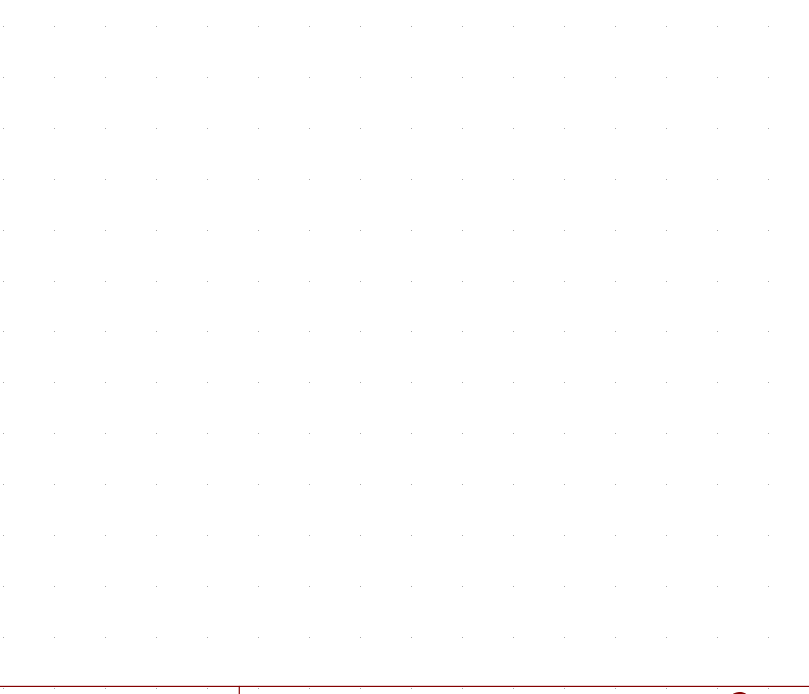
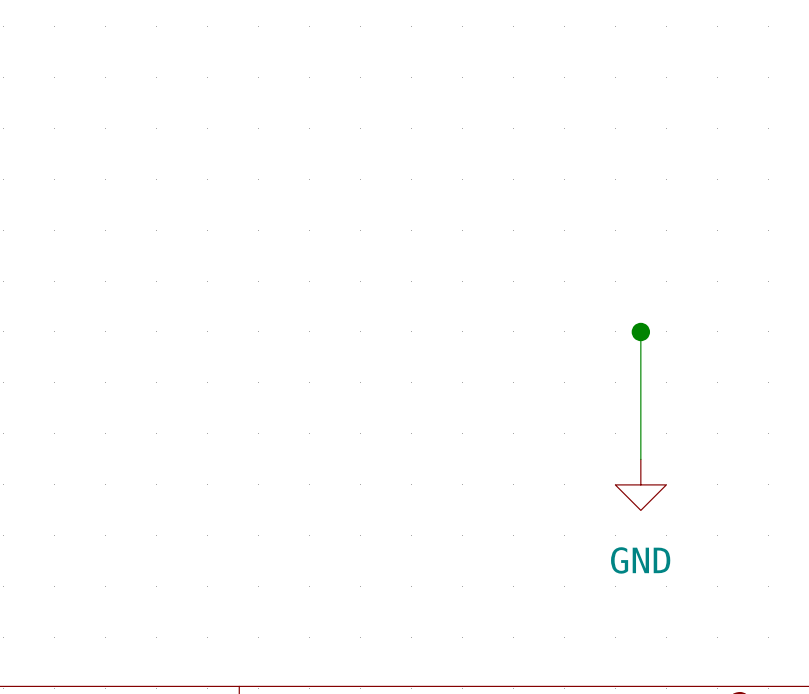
wire: none -> (640, 331) (640, 459)
junction: none -> (640, 331)
power symbol: none -> GND (640, 484)

